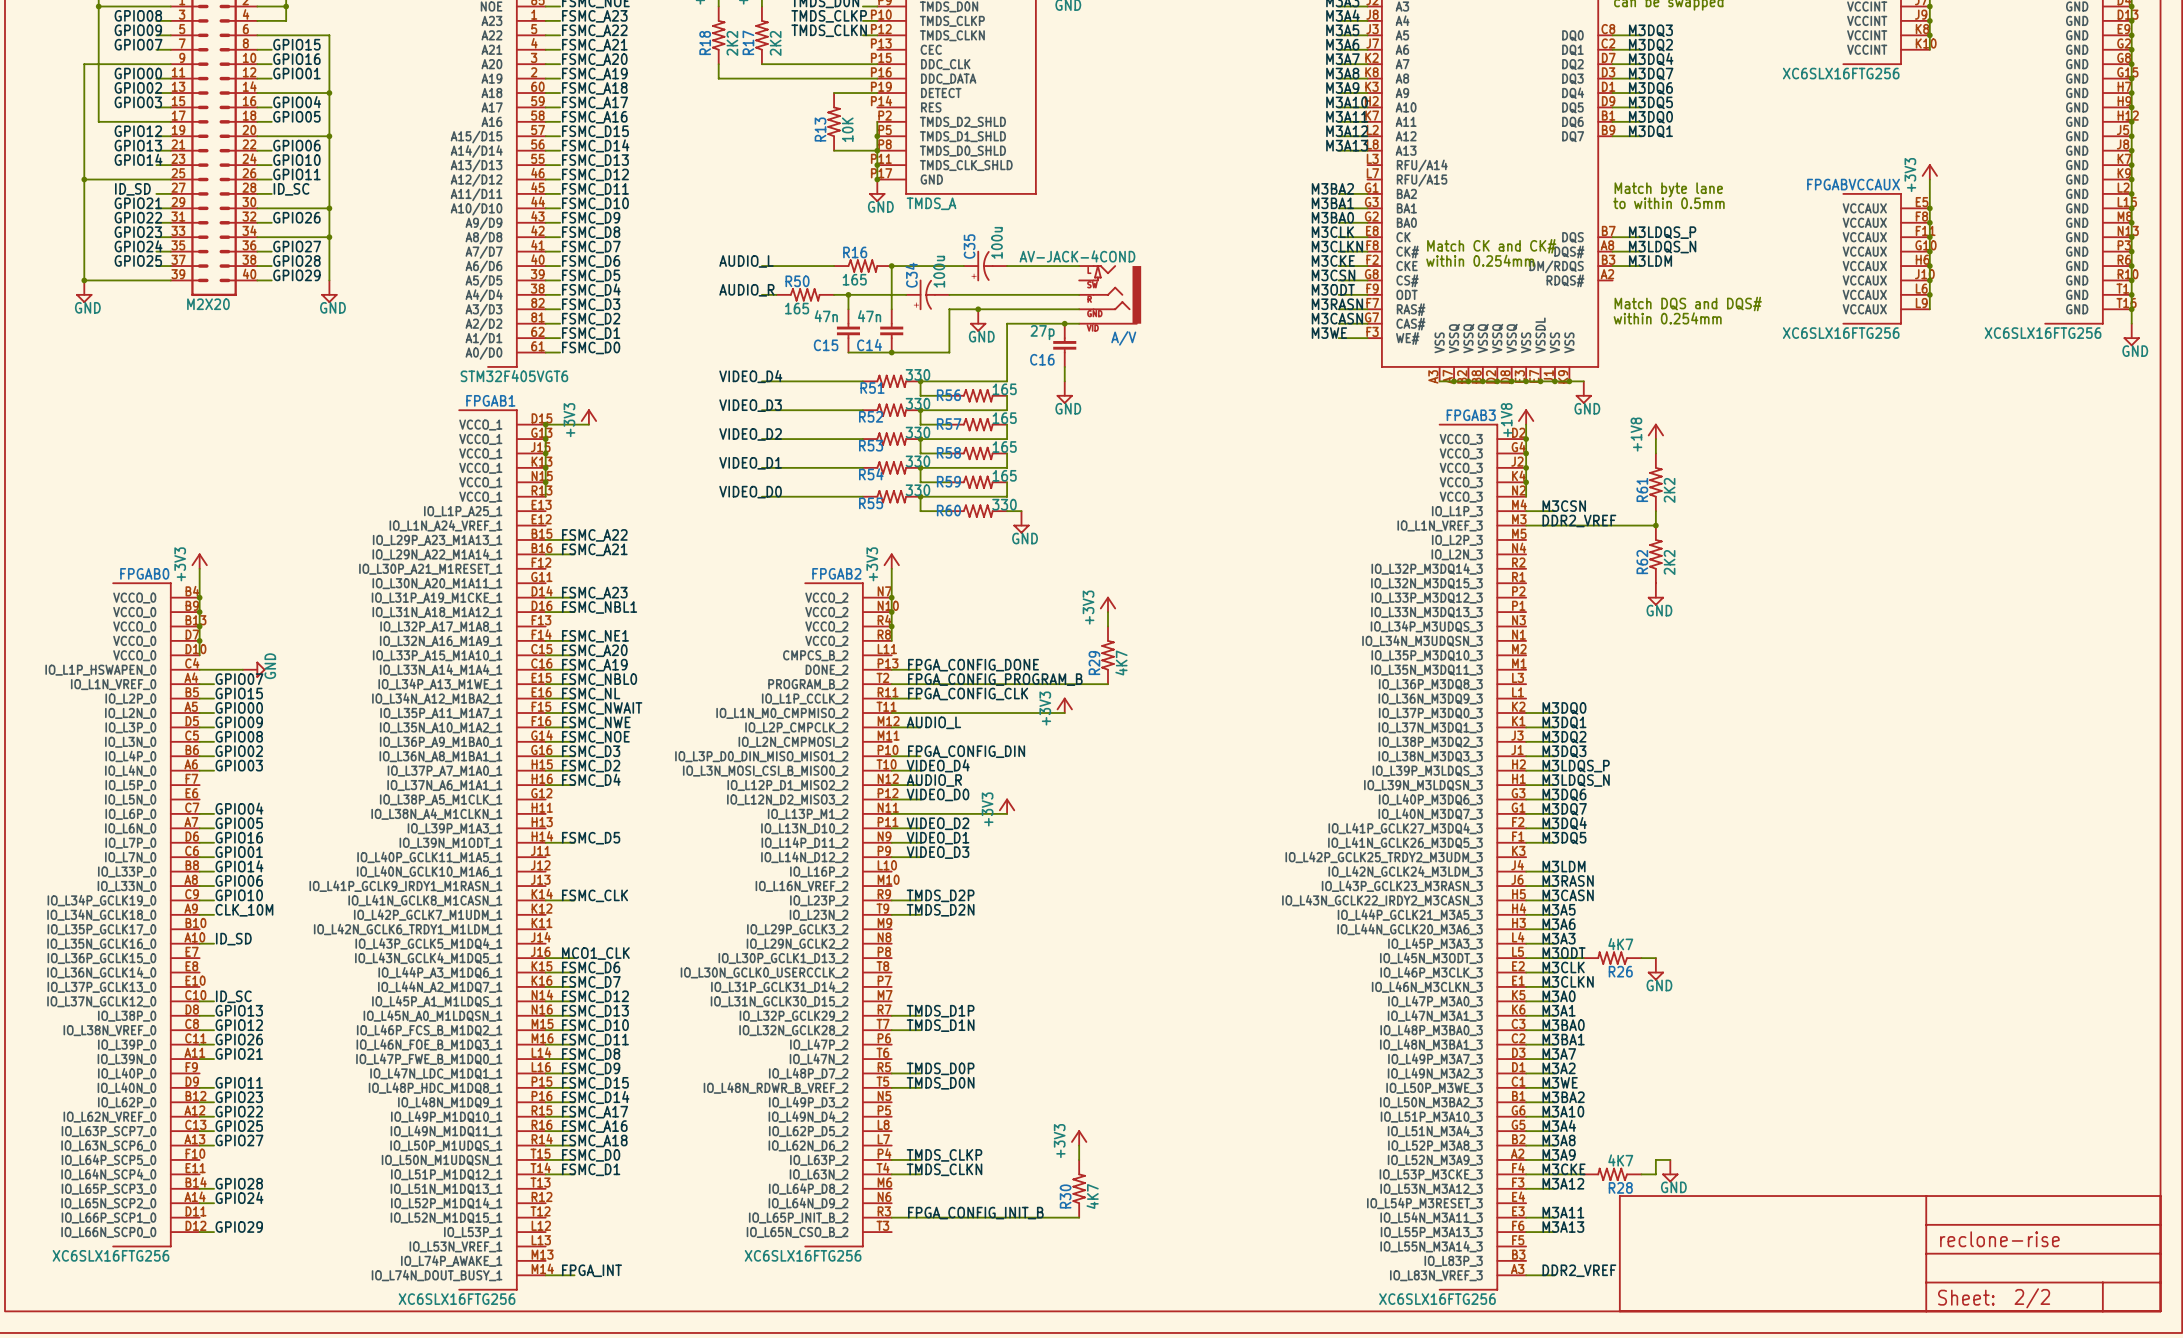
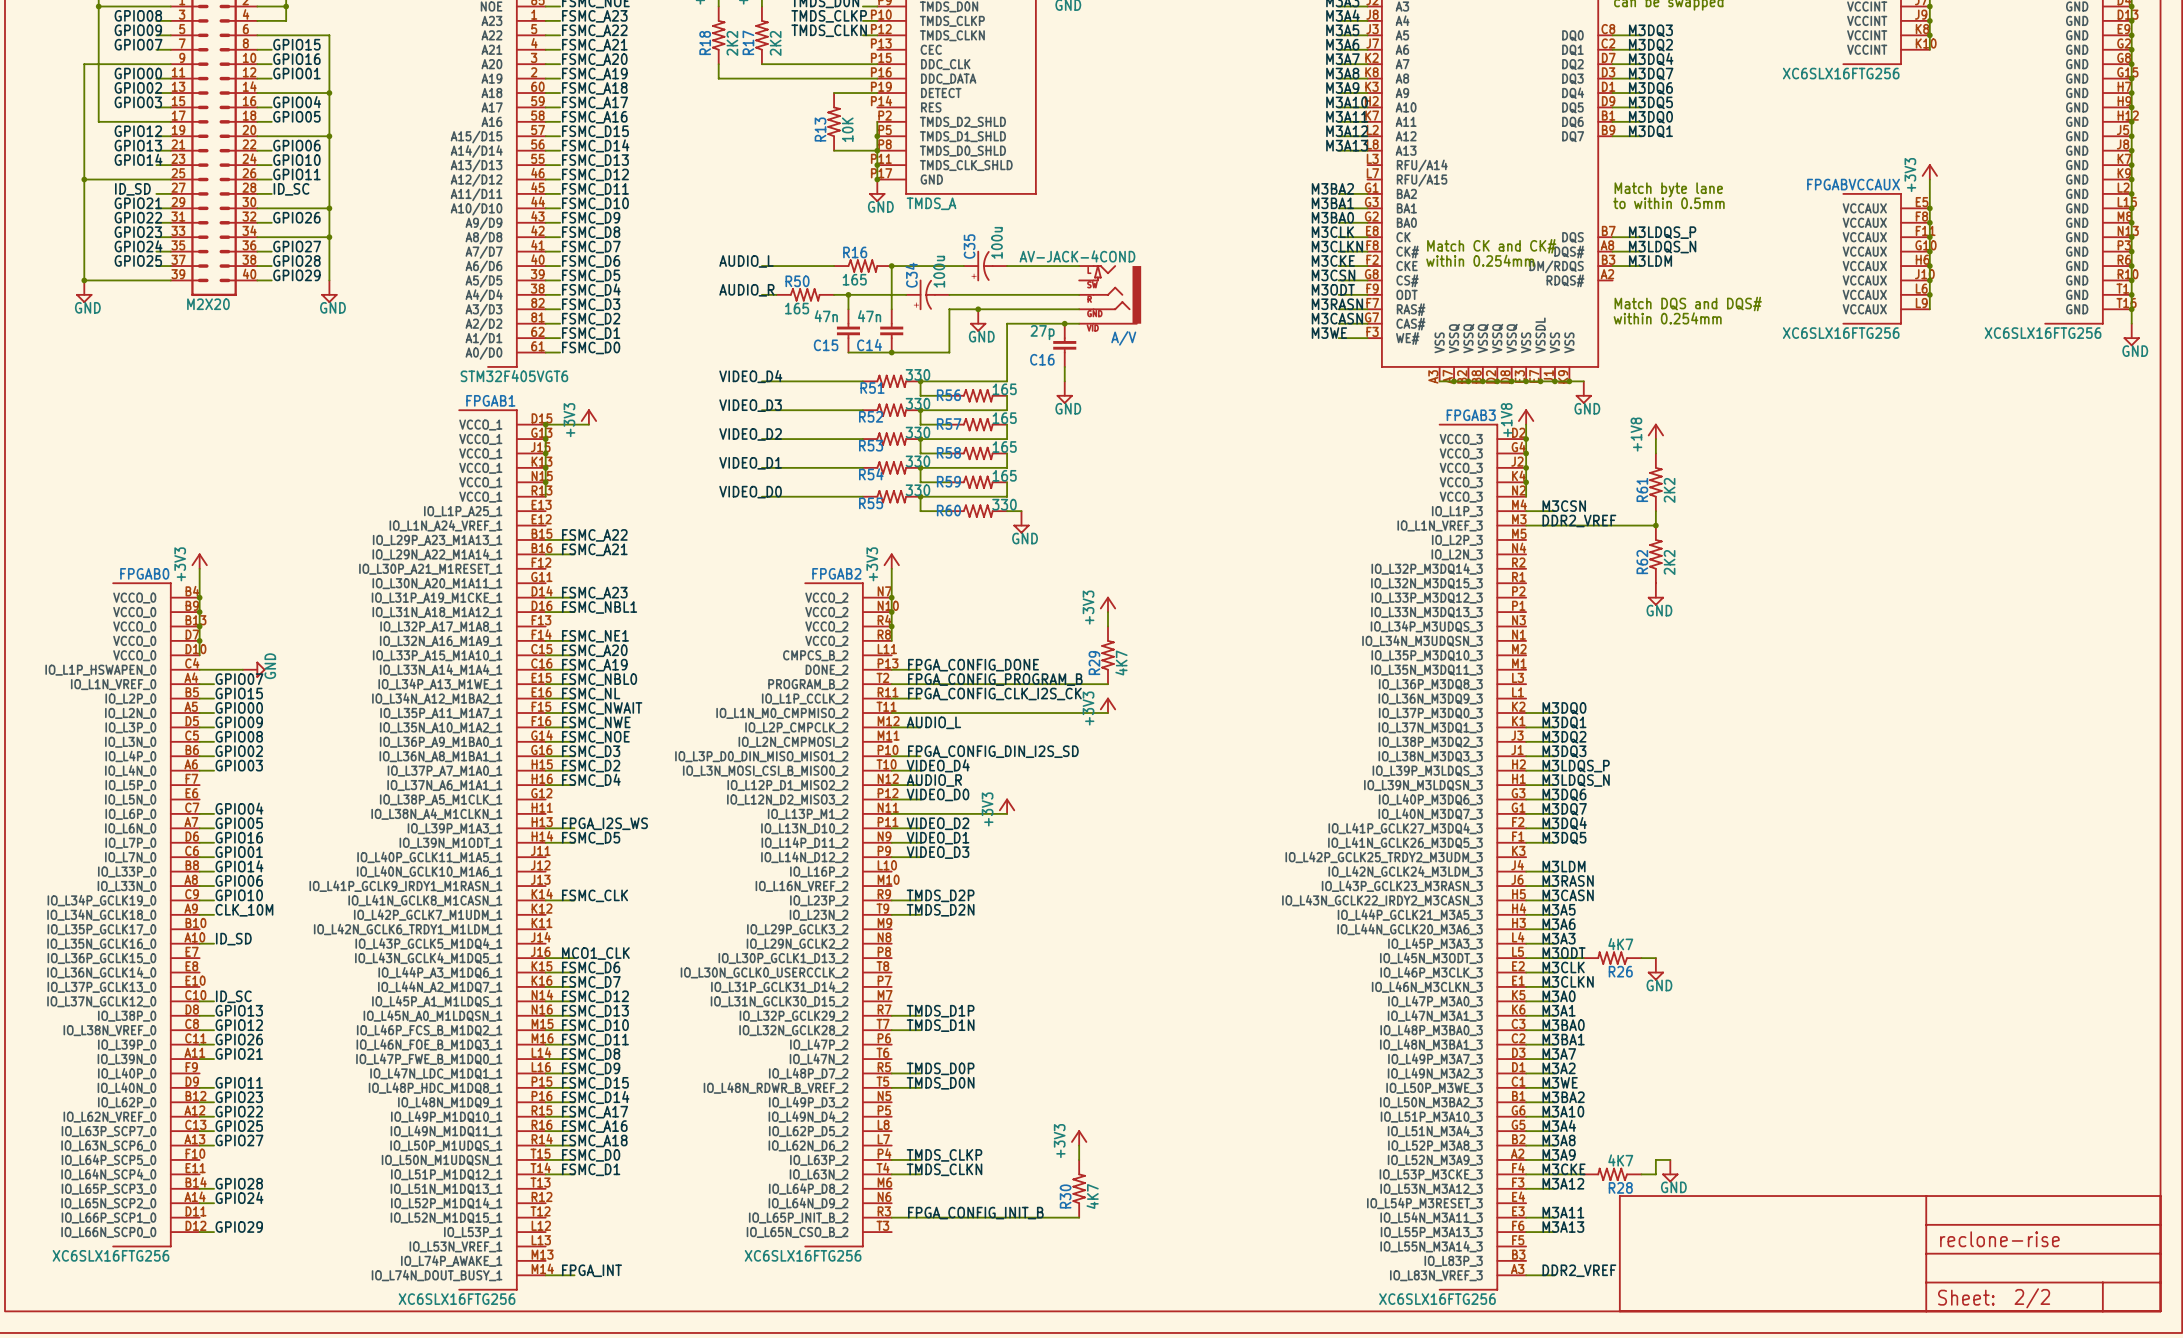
label: FPGA_CONFIG_CLK (968, 694) -> FPGA_CONFIG_CLK_I2S_CK (994, 694)
power symbol position: +3V3 (1064, 705) -> +3V3 (1107, 705)
wire: none -> (1064, 713) (1107, 713)
label: FPGA_CONFIG_DIN (966, 751) -> FPGA_CONFIG_DIN_I2S_SD (993, 751)
label: none -> FPGA_I2S_WS (604, 823)
wire: none -> (545, 828) (574, 828)

